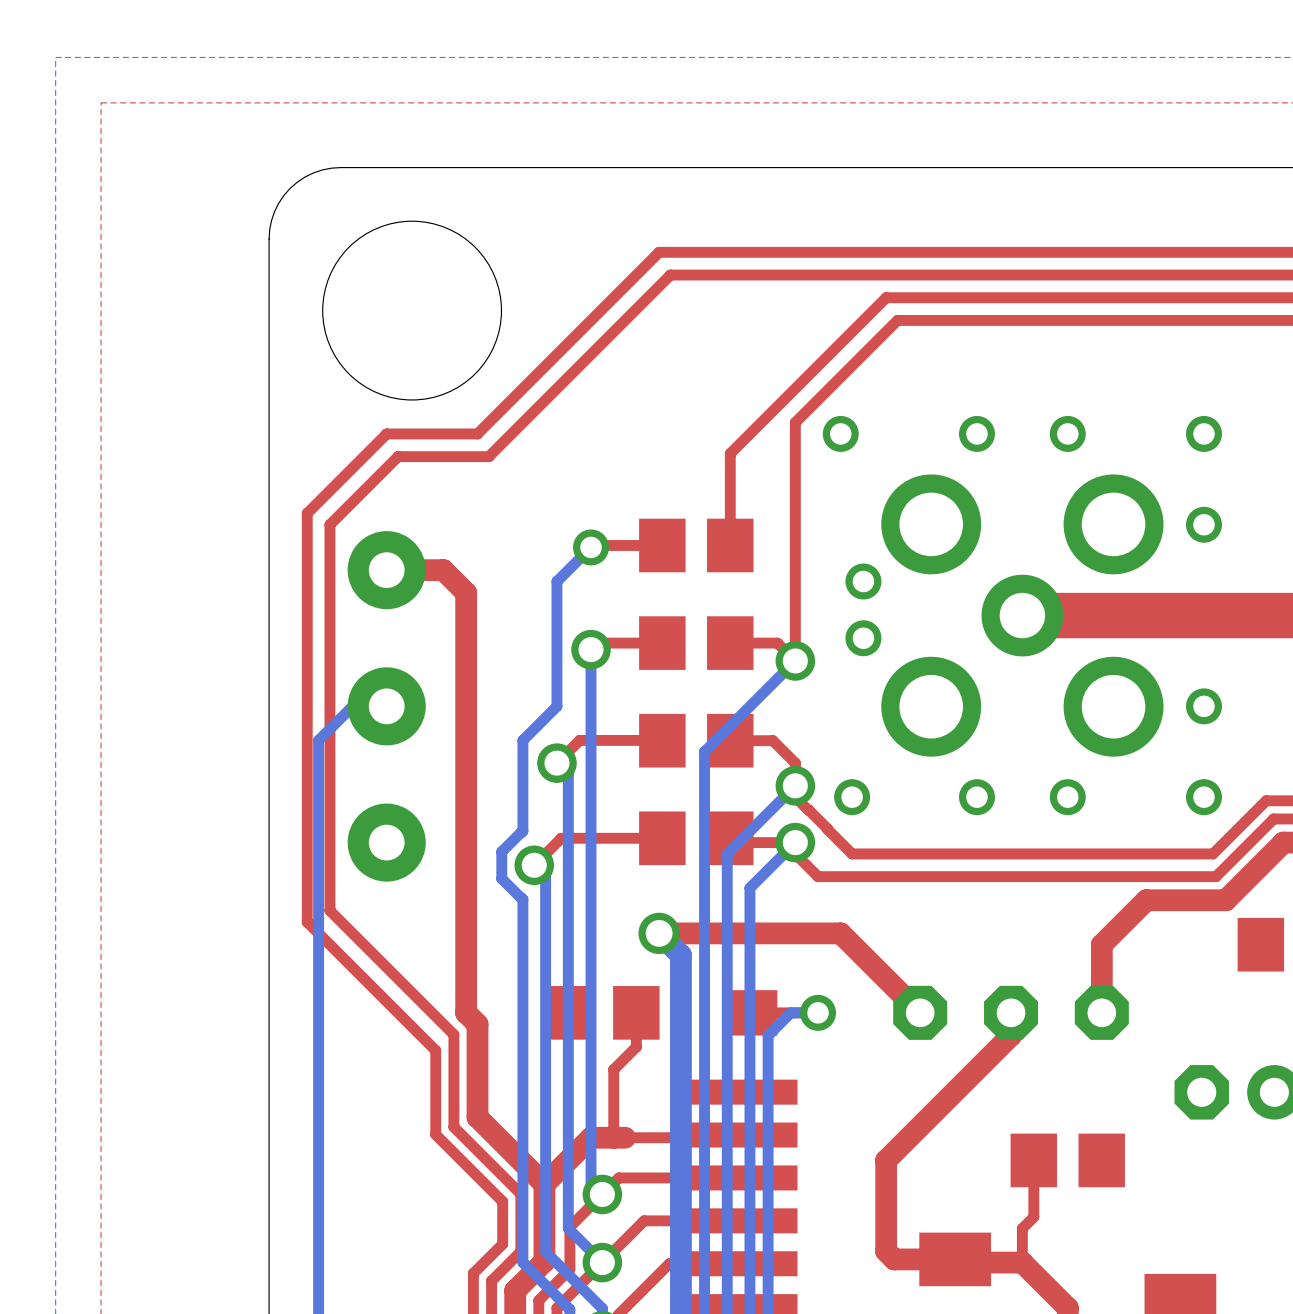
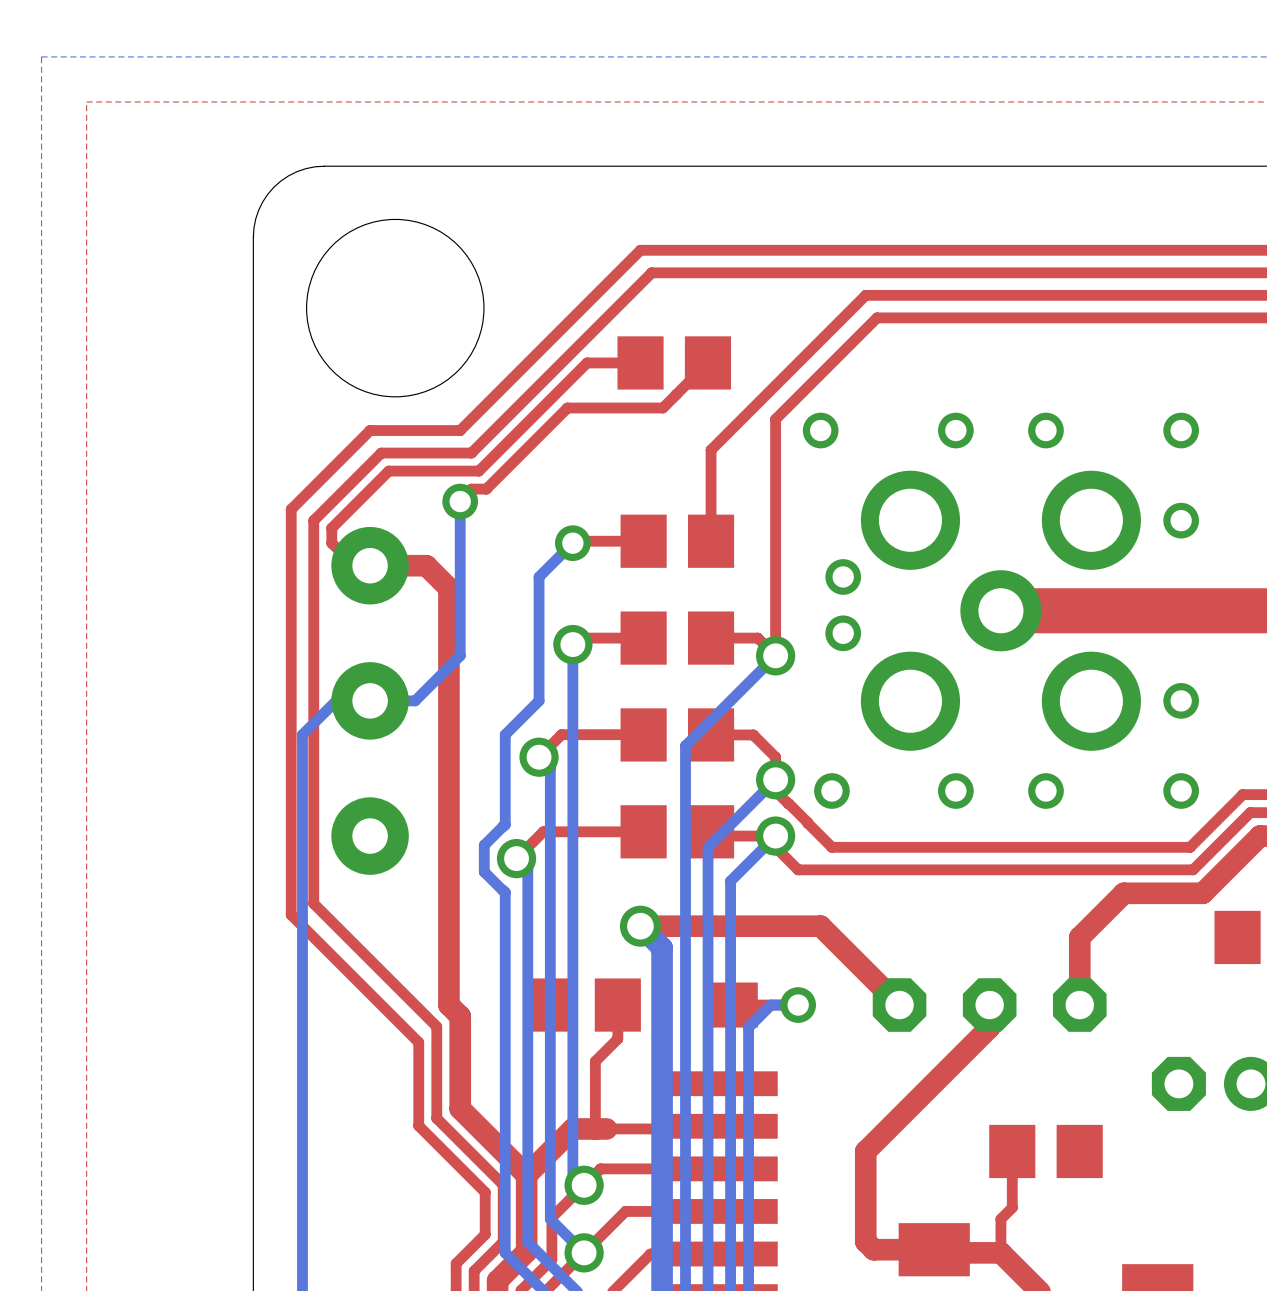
top track: none -> (640, 362) (587, 362) (478, 471) (388, 471) (331, 528) (331, 543) (354, 565) (370, 565)
part: none -> (674, 362)
top track: none -> (707, 362) (662, 408) (567, 408) (486, 489) (471, 489) (460, 501)
bottom track: none -> (460, 501) (460, 655) (415, 700) (370, 700)
via: none -> (460, 501)

